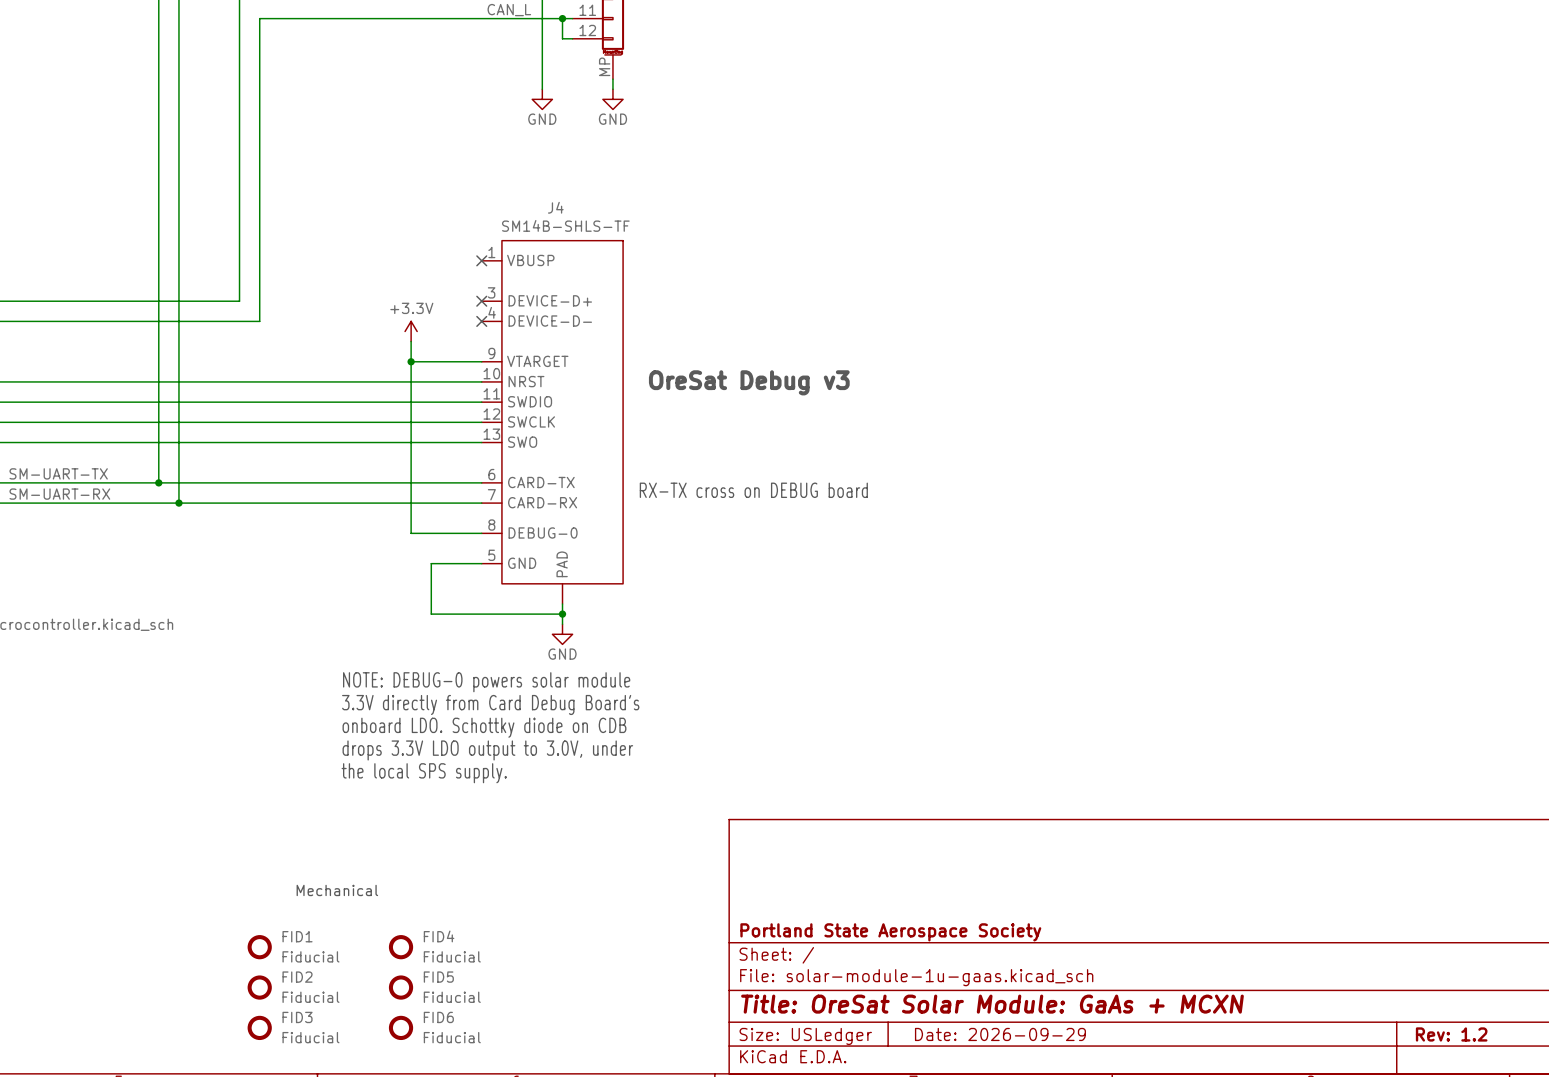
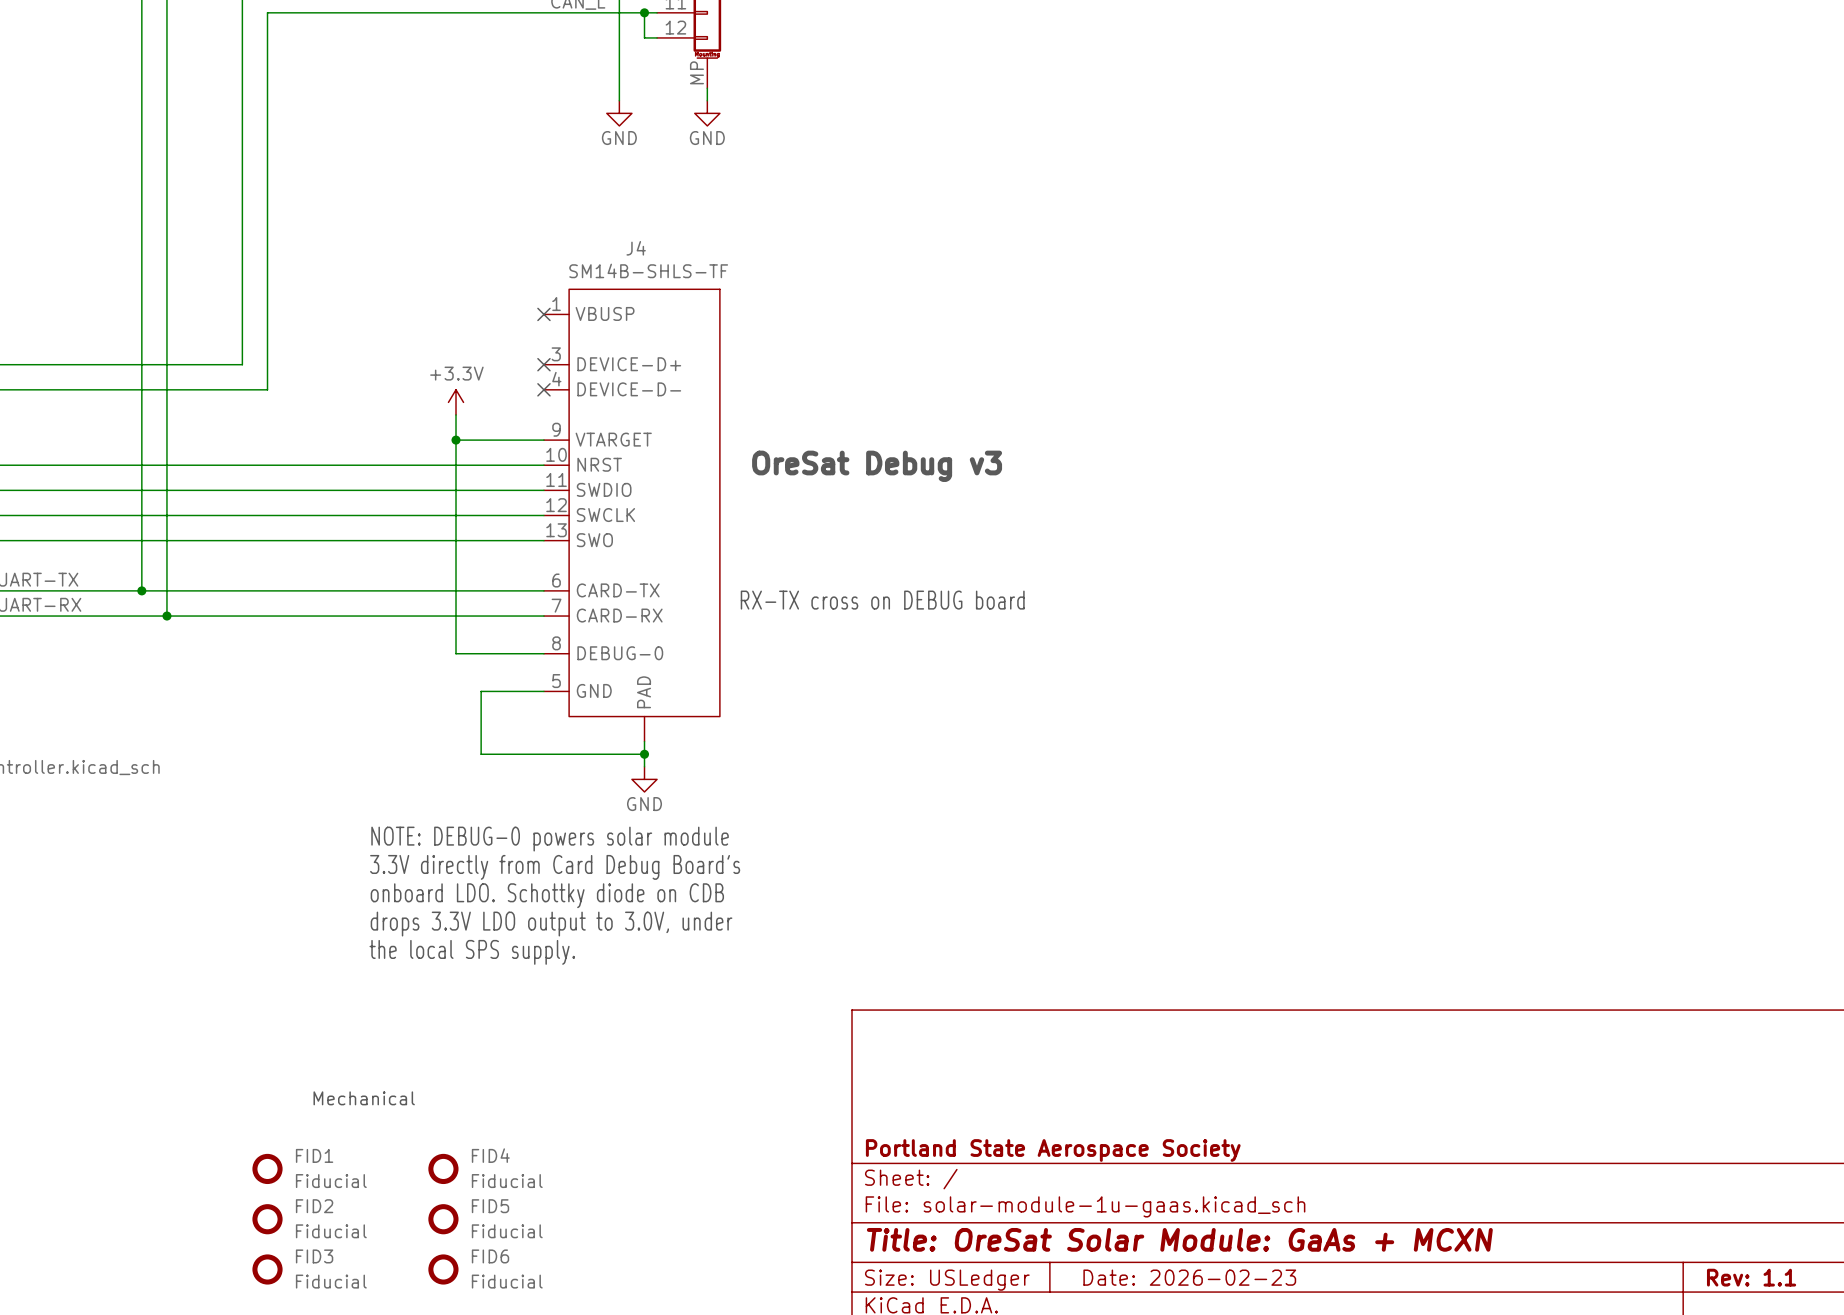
title block: Date: 2026-09-29 (1000, 1034) -> Date: 2026-02-23 (1189, 1277)
title block: Rev: 1.2 (1451, 1034) -> Rev: 1.1 (1751, 1277)

